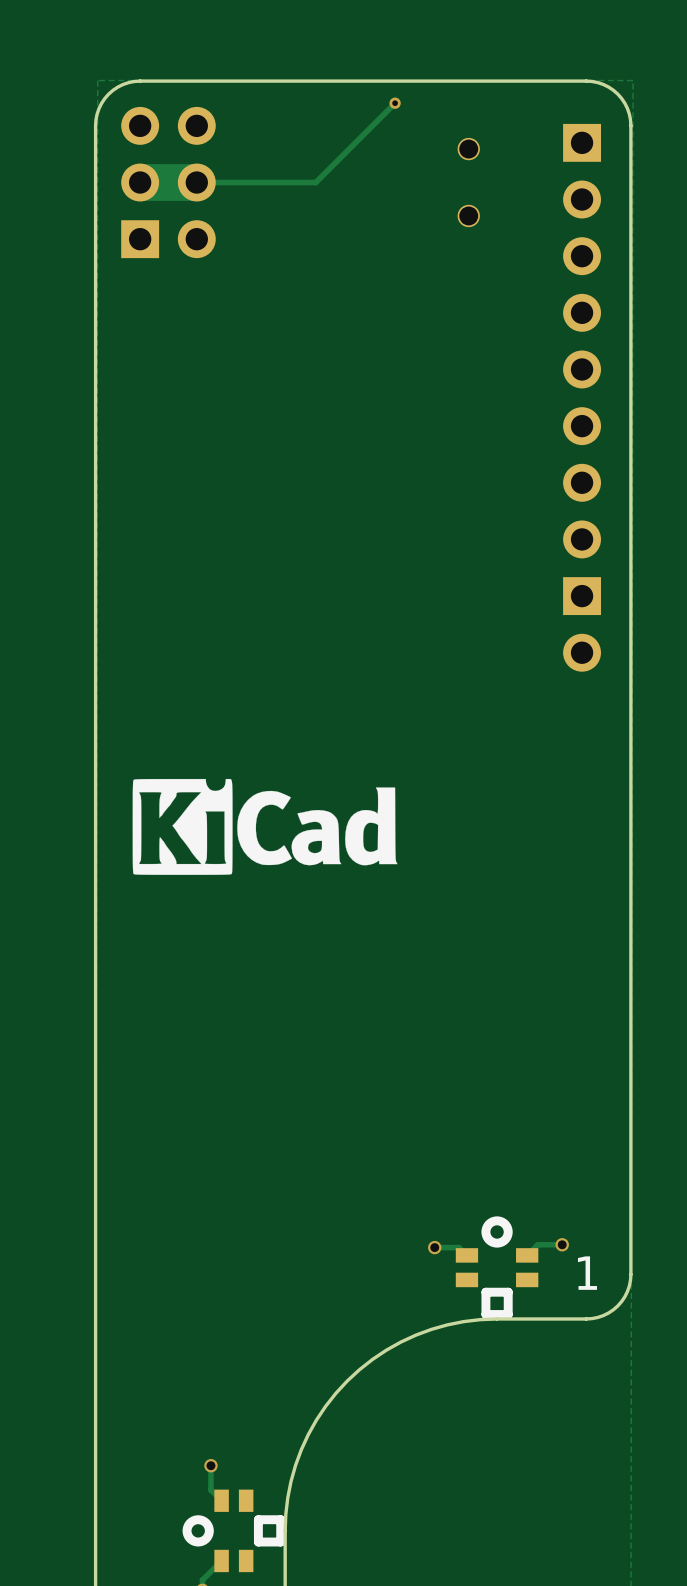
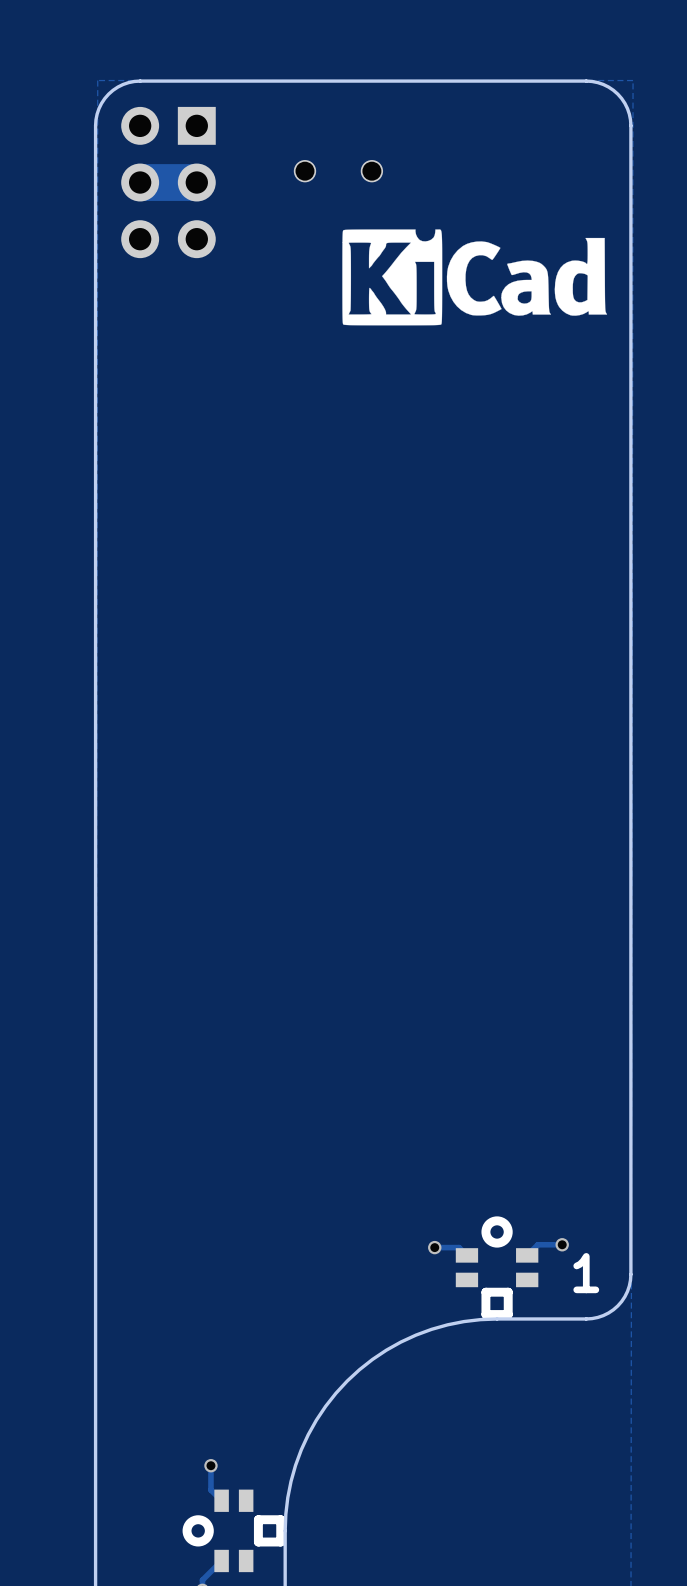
track: (395, 103) (315, 182) (196, 182) -> none
via: (395, 103) -> none
part rotation: 0° (168, 182) -> 180° (168, 182)
part rotation: 0° (468, 182) -> 90° clockwise (338, 171)
part position: (468, 182) -> (338, 171)
drawing: none -> [342, 229, 608, 326]
part: (582, 341) -> none
part: (582, 624) -> none
drawing: [132, 778, 398, 875] -> none

